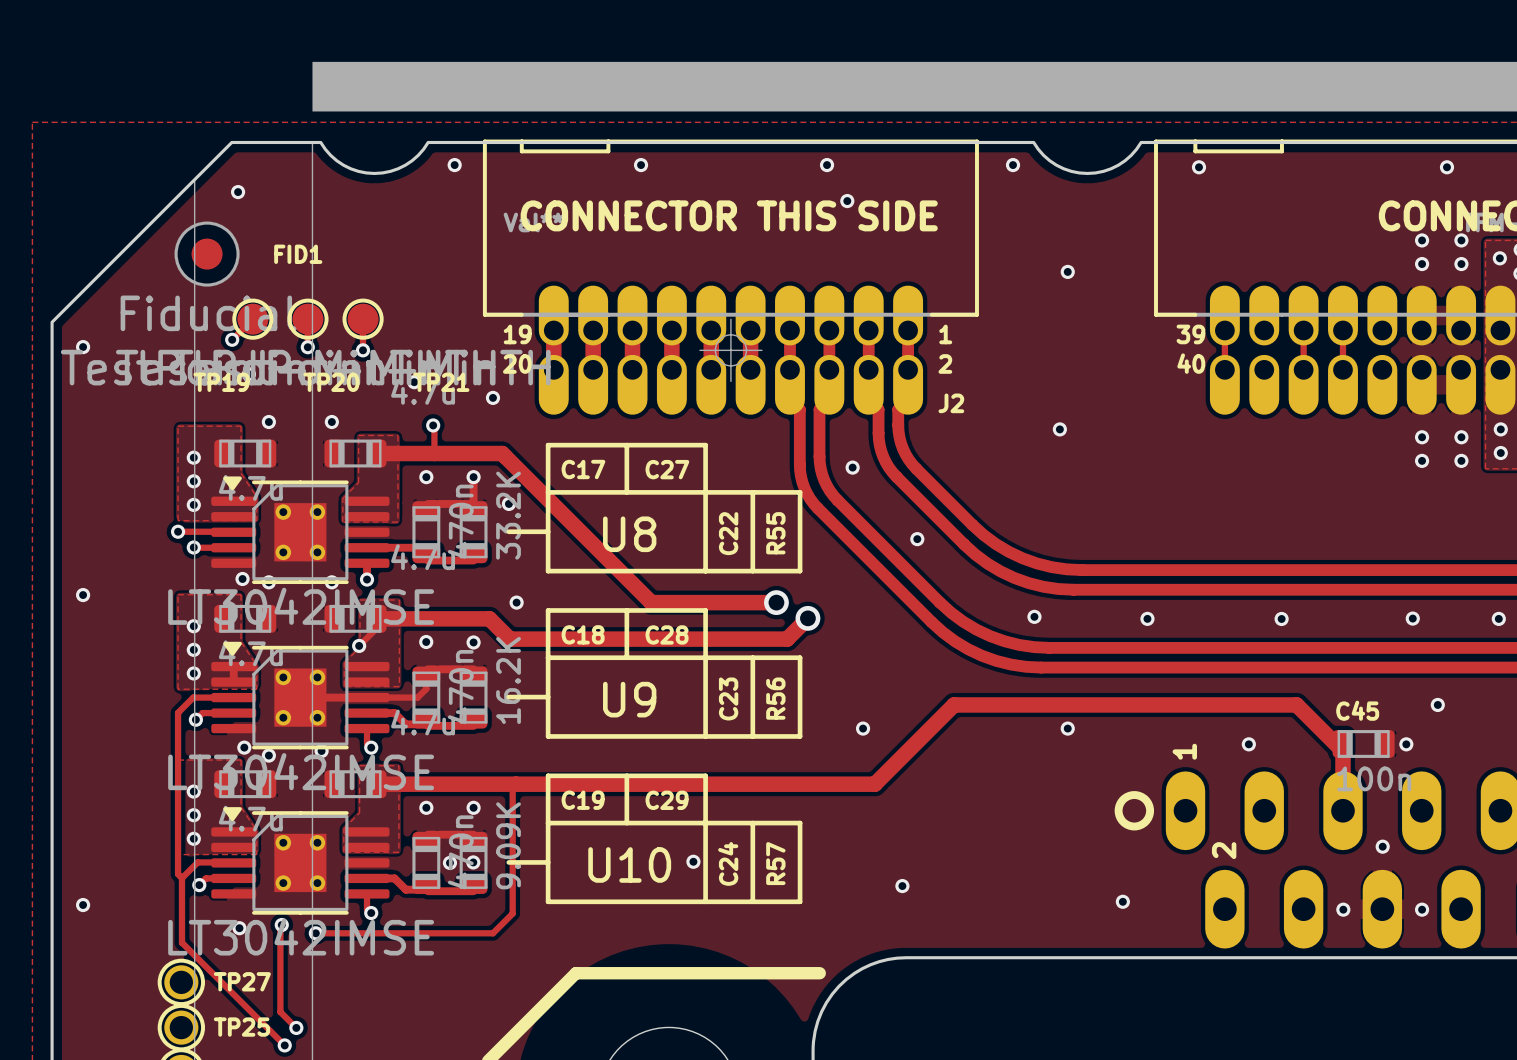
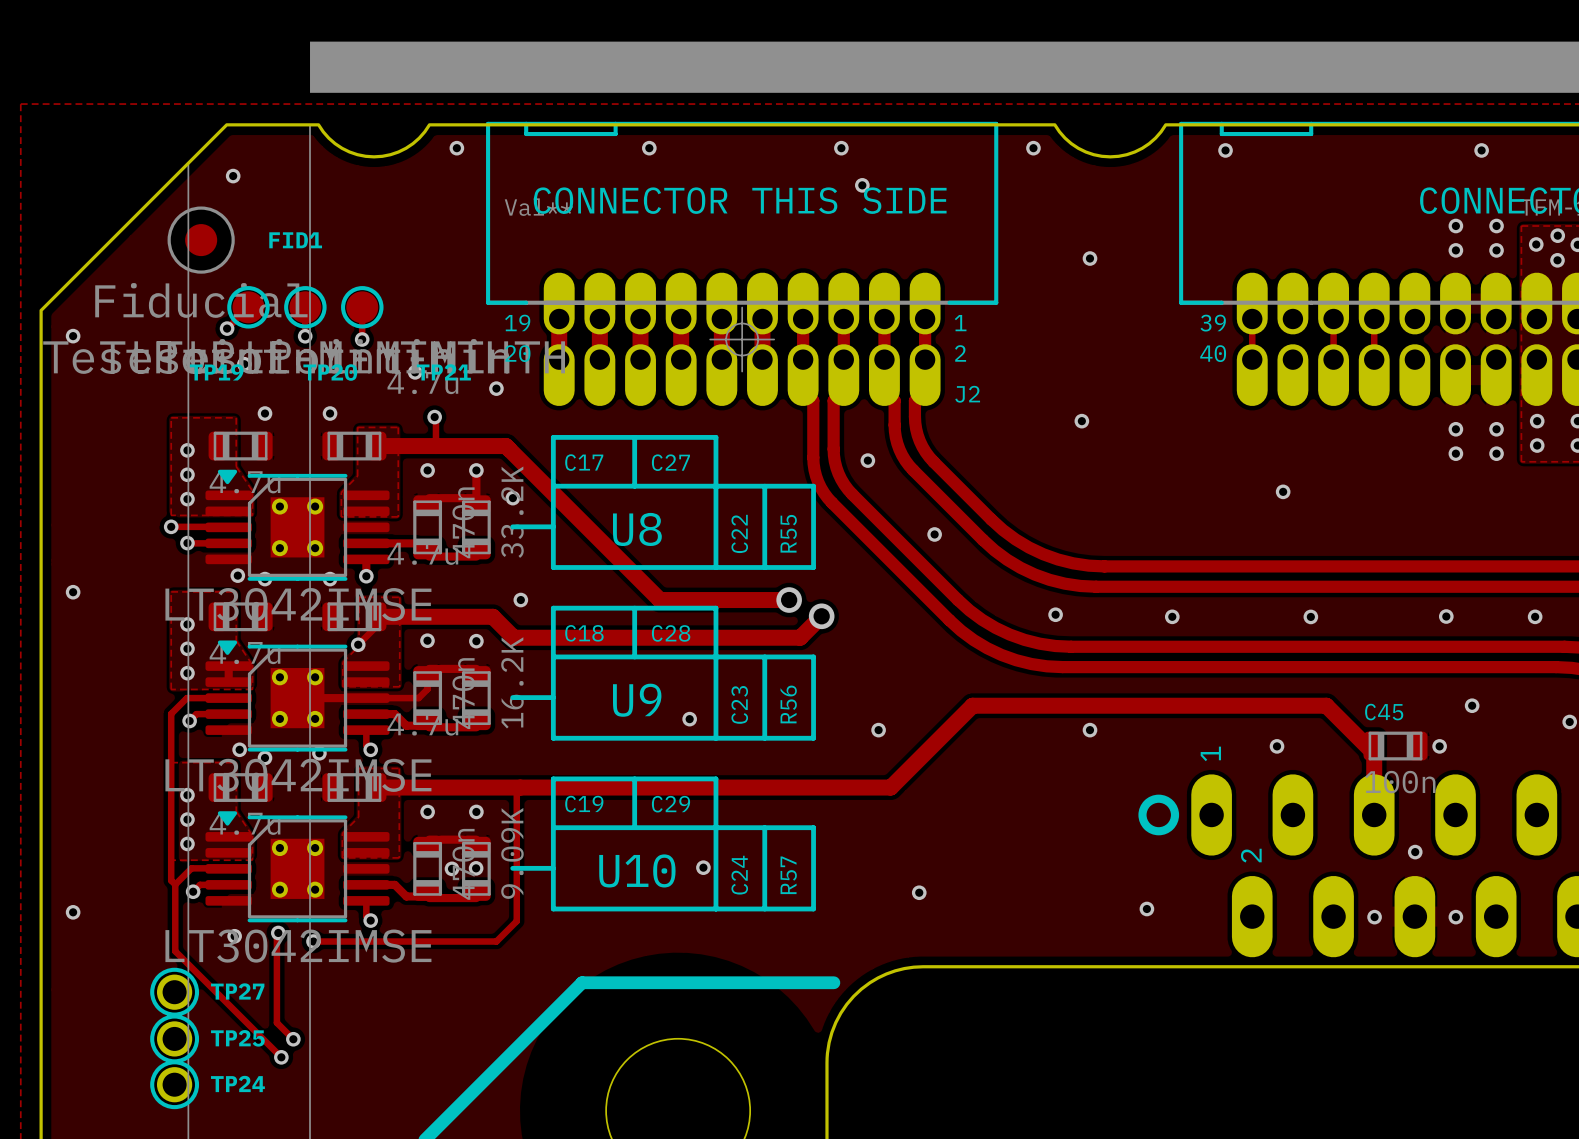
via: none -> (1283, 491)
via: none -> (689, 719)

